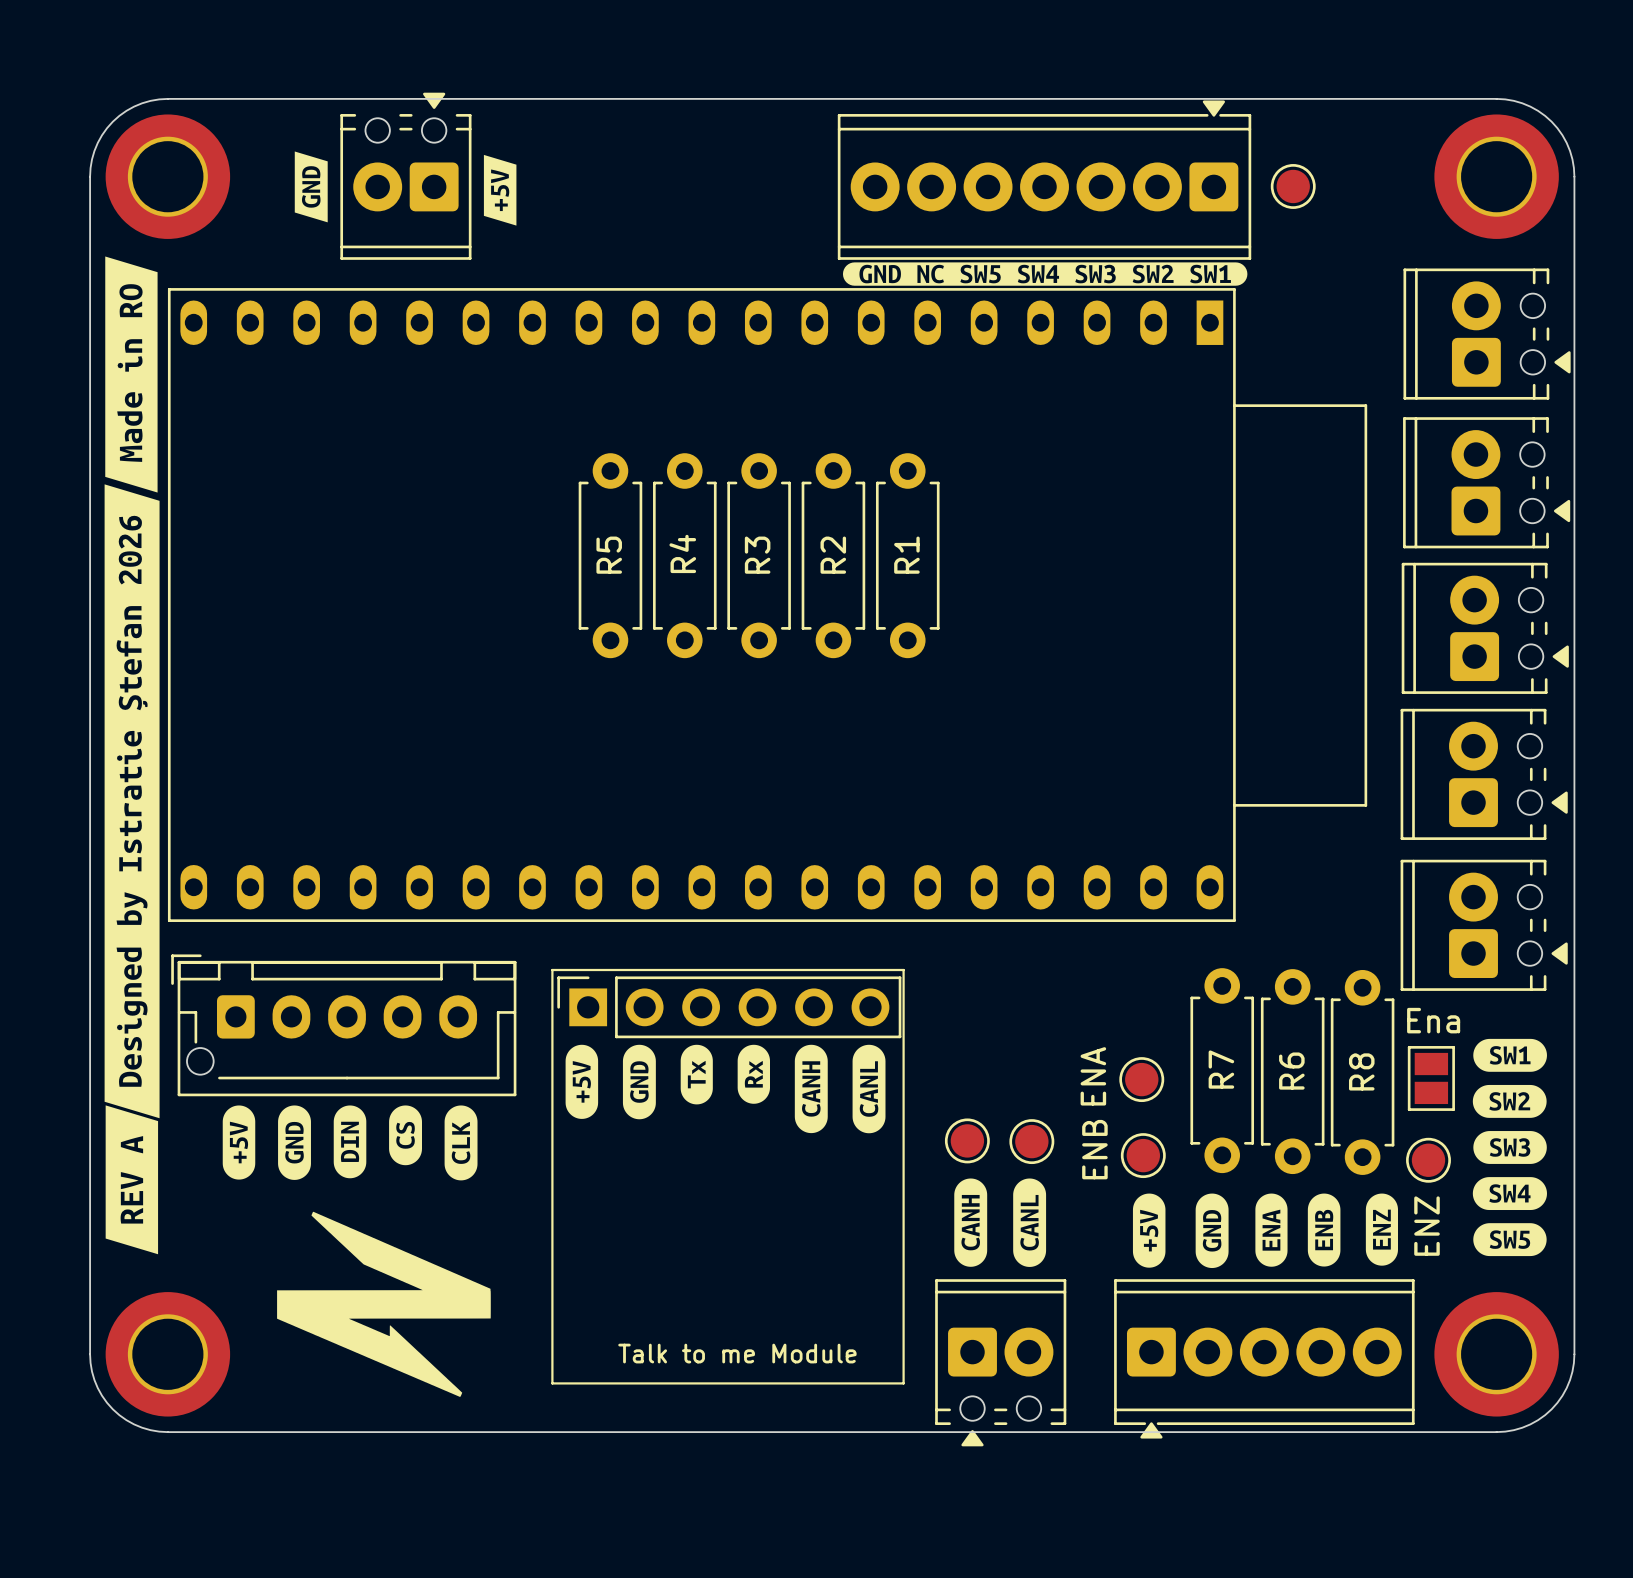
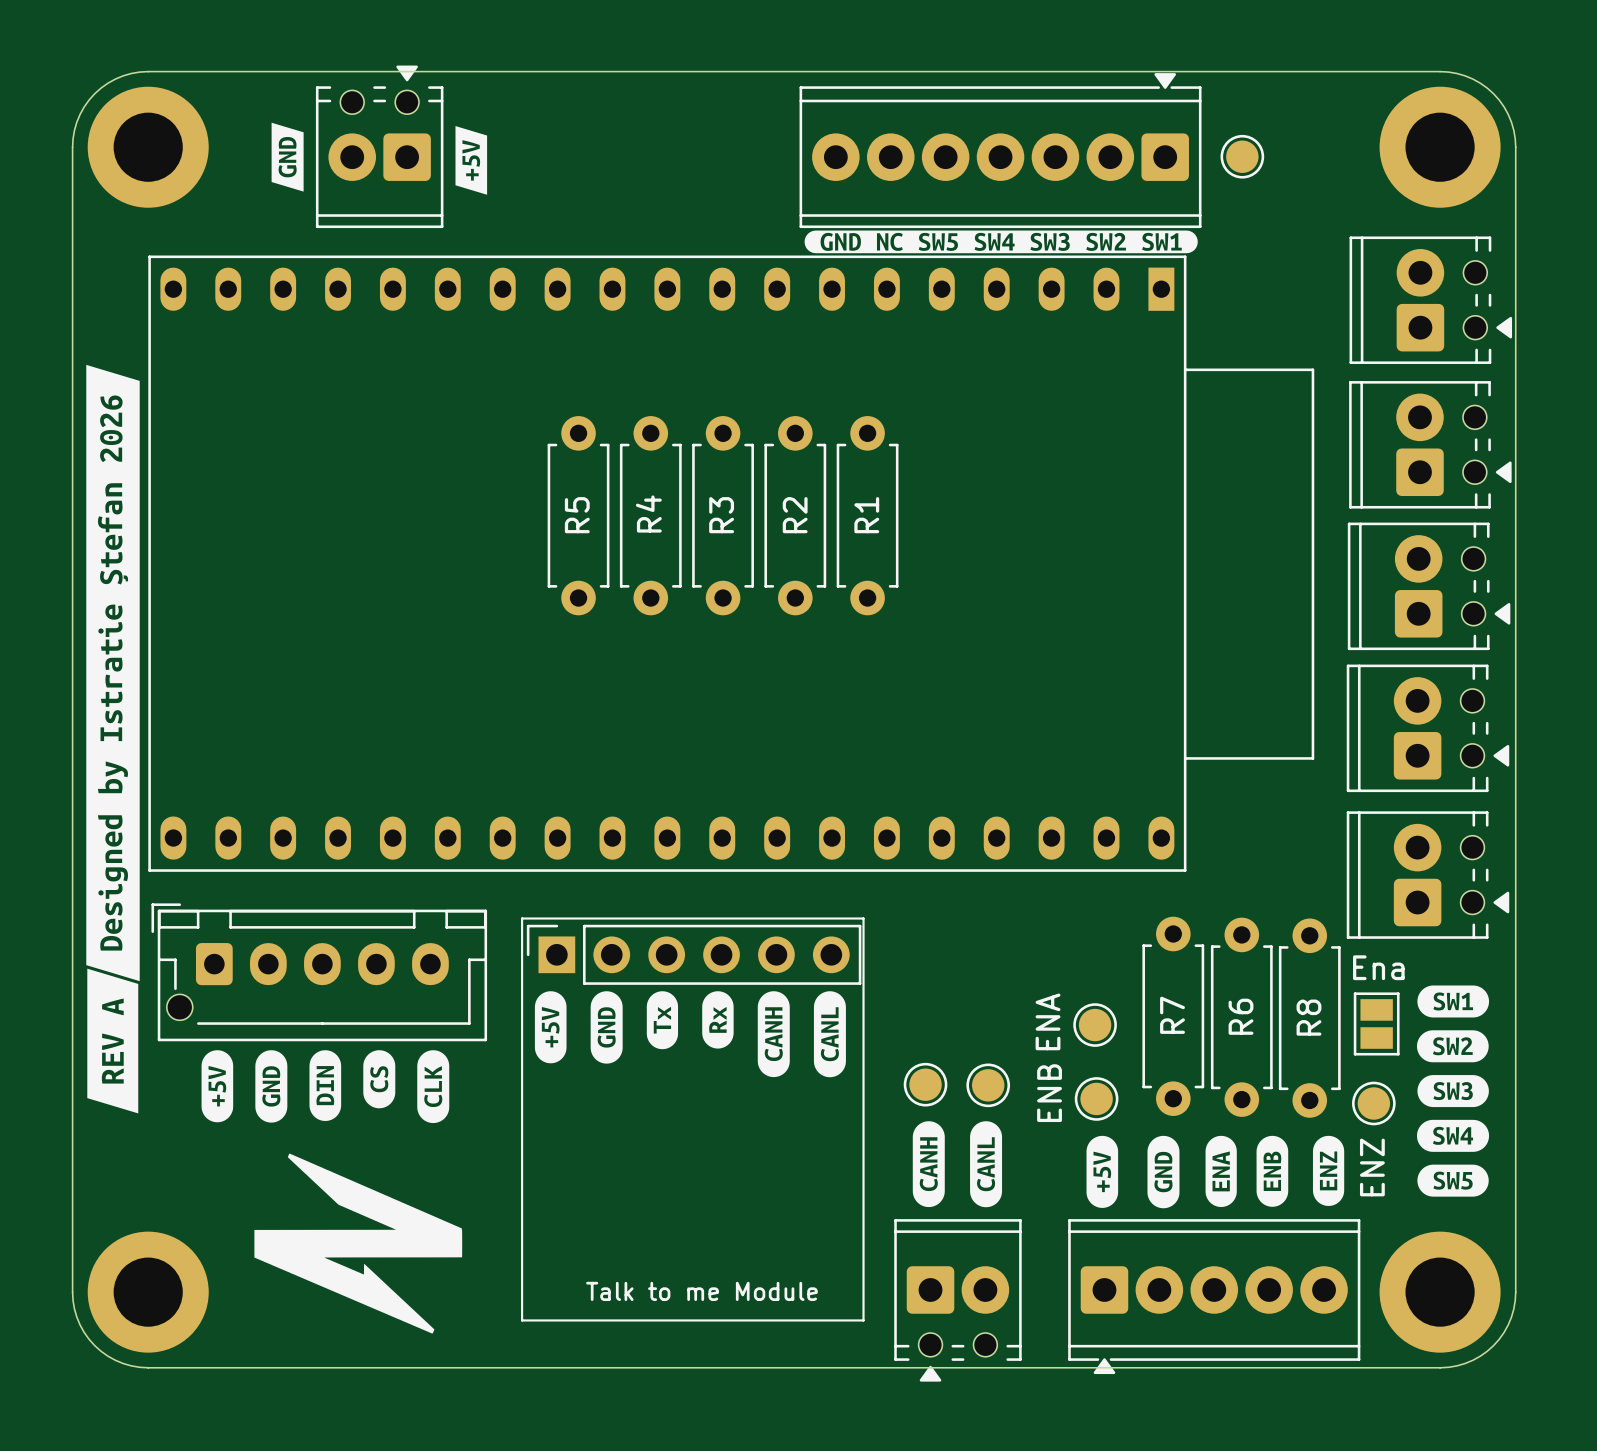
drawing: [105, 256, 158, 493] -> none
drawing position: (132, 801) -> (112, 673)
drawing position: (131, 1179) -> (112, 1041)

